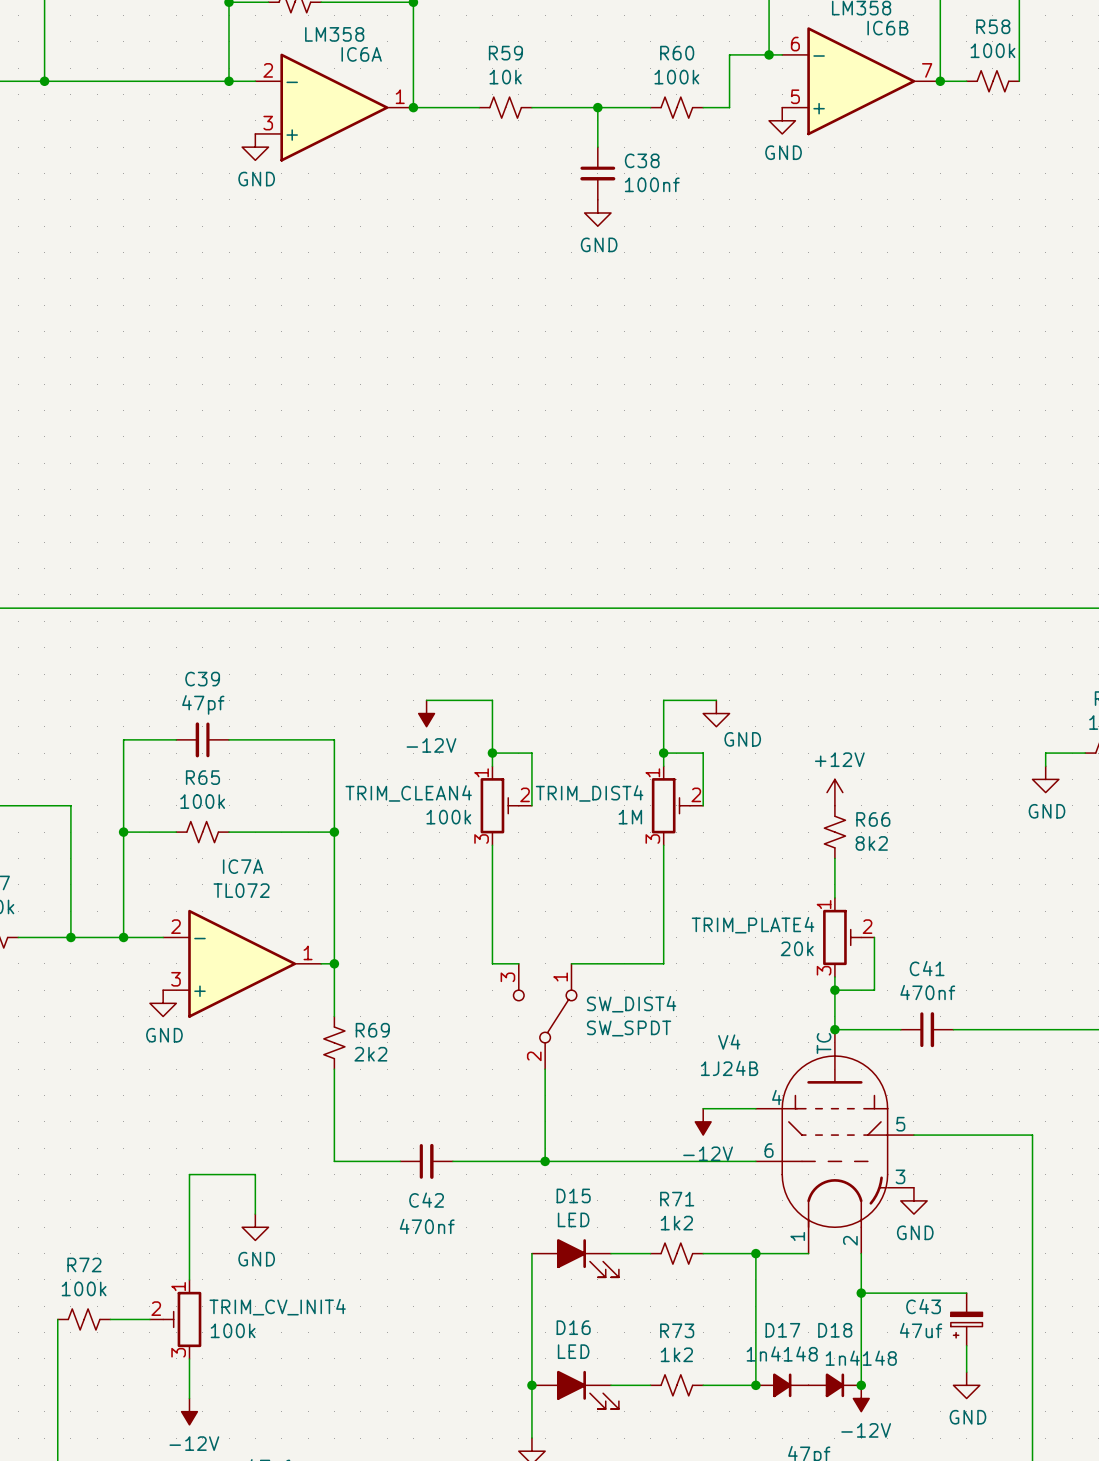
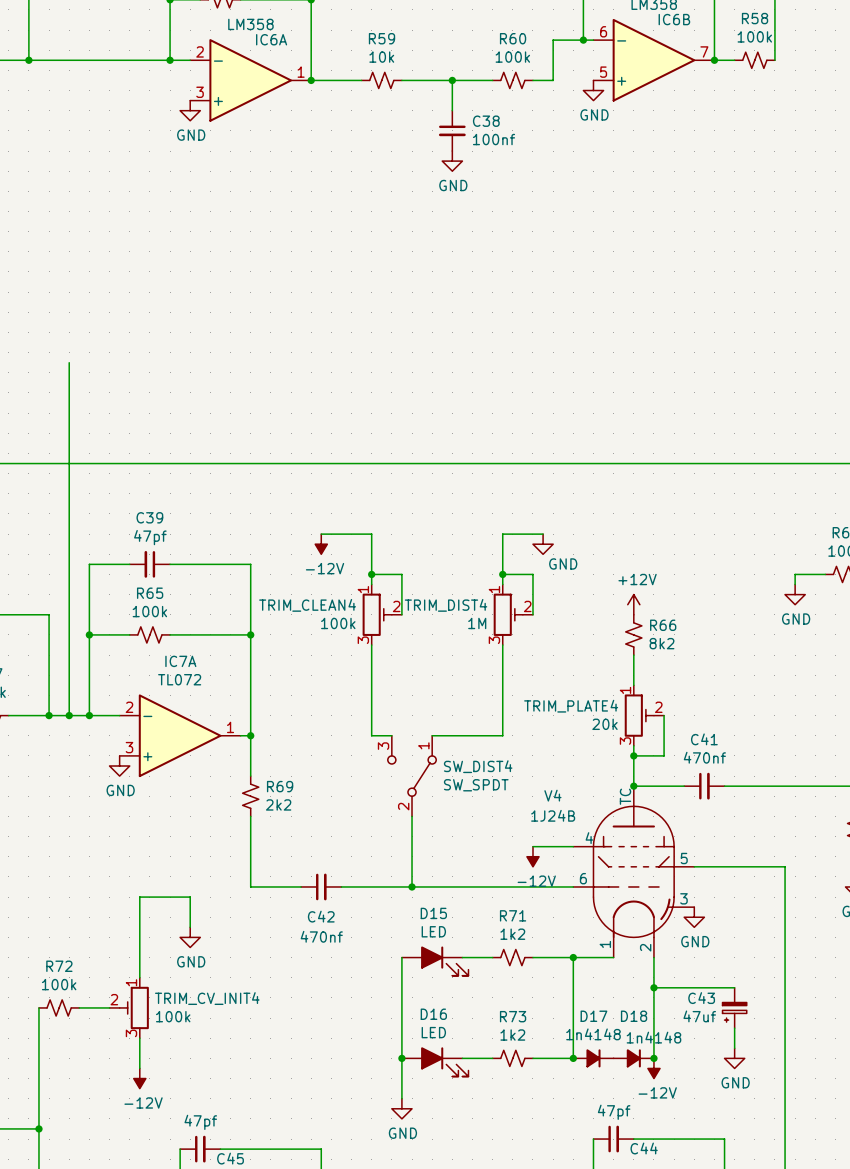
wire: none -> (69, 362) (69, 715)
junction: none -> (69, 715)

